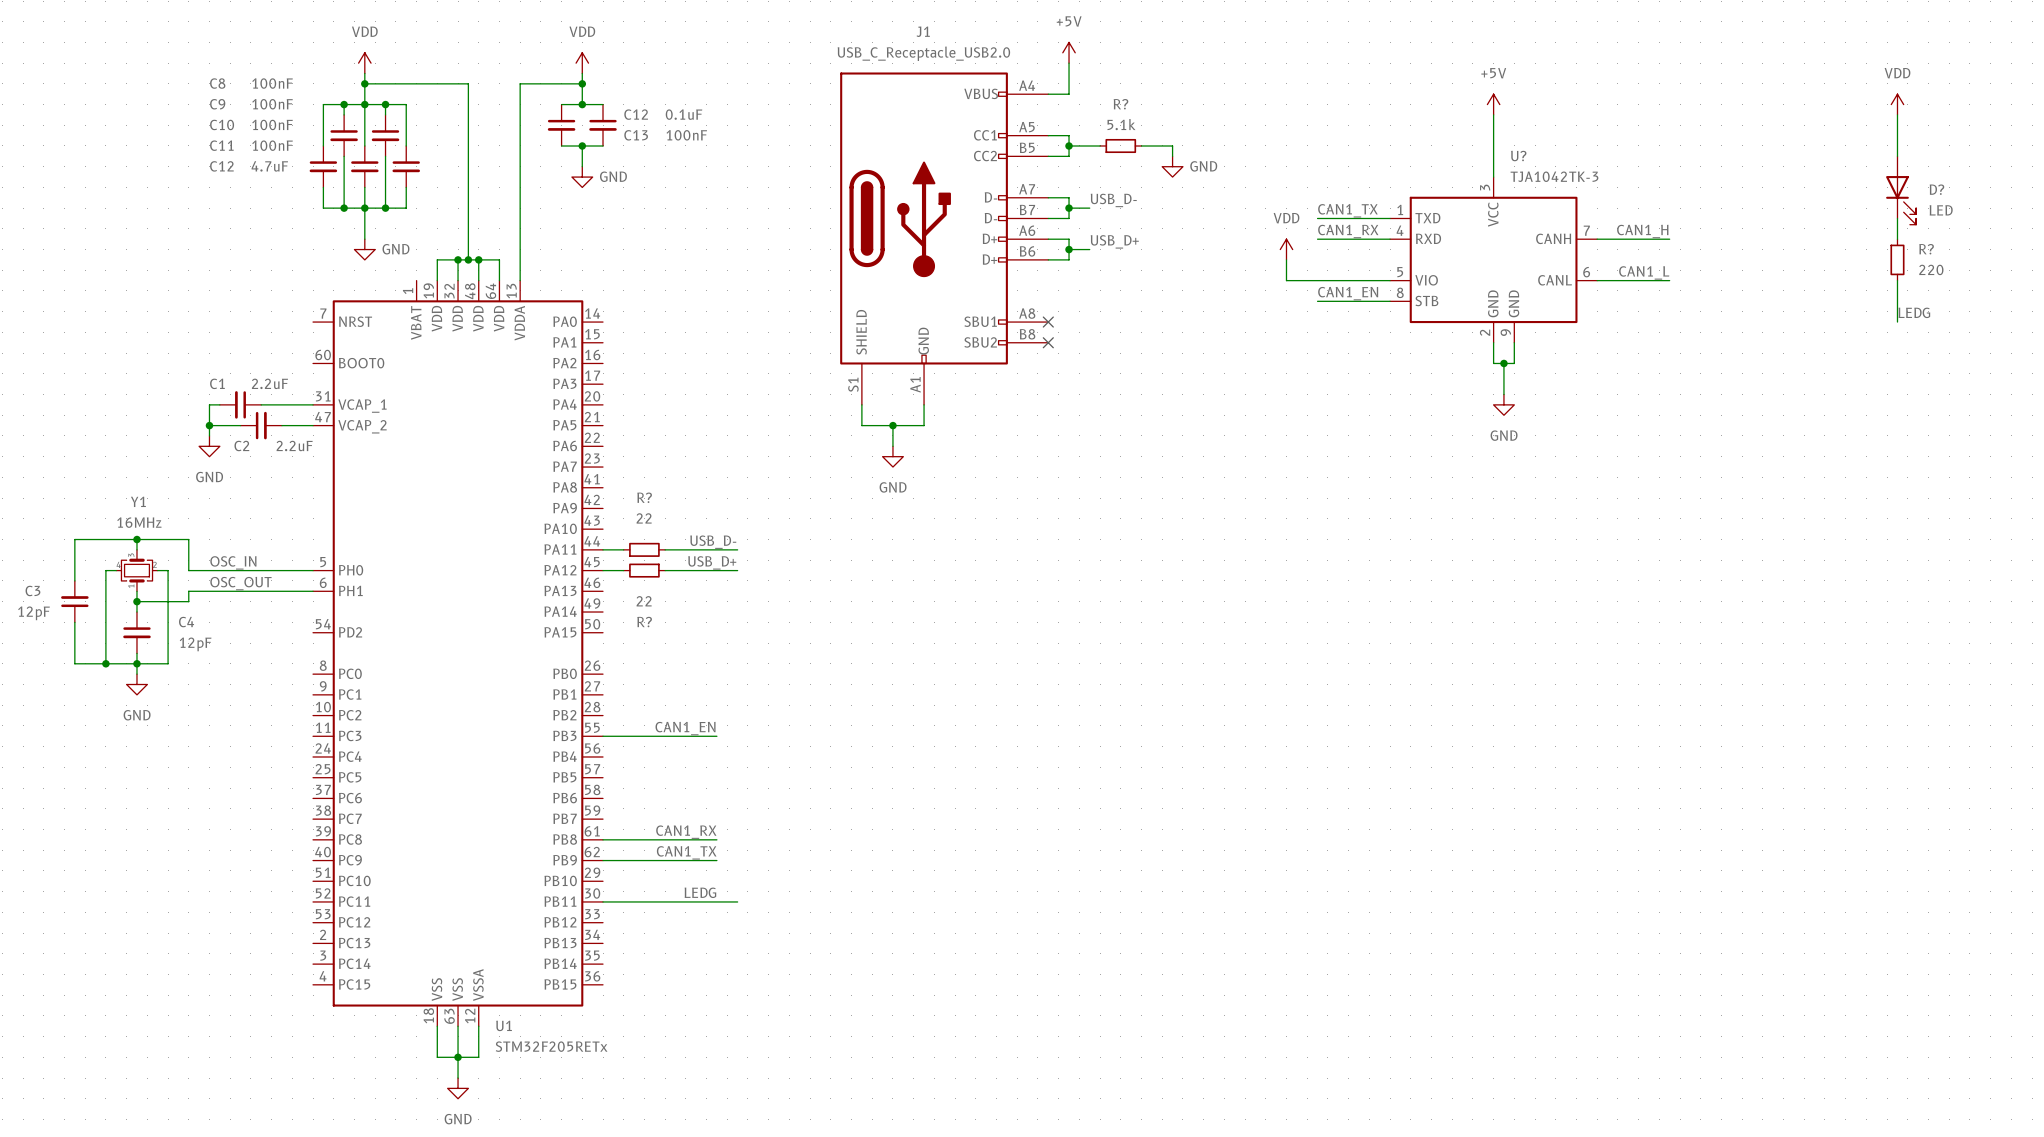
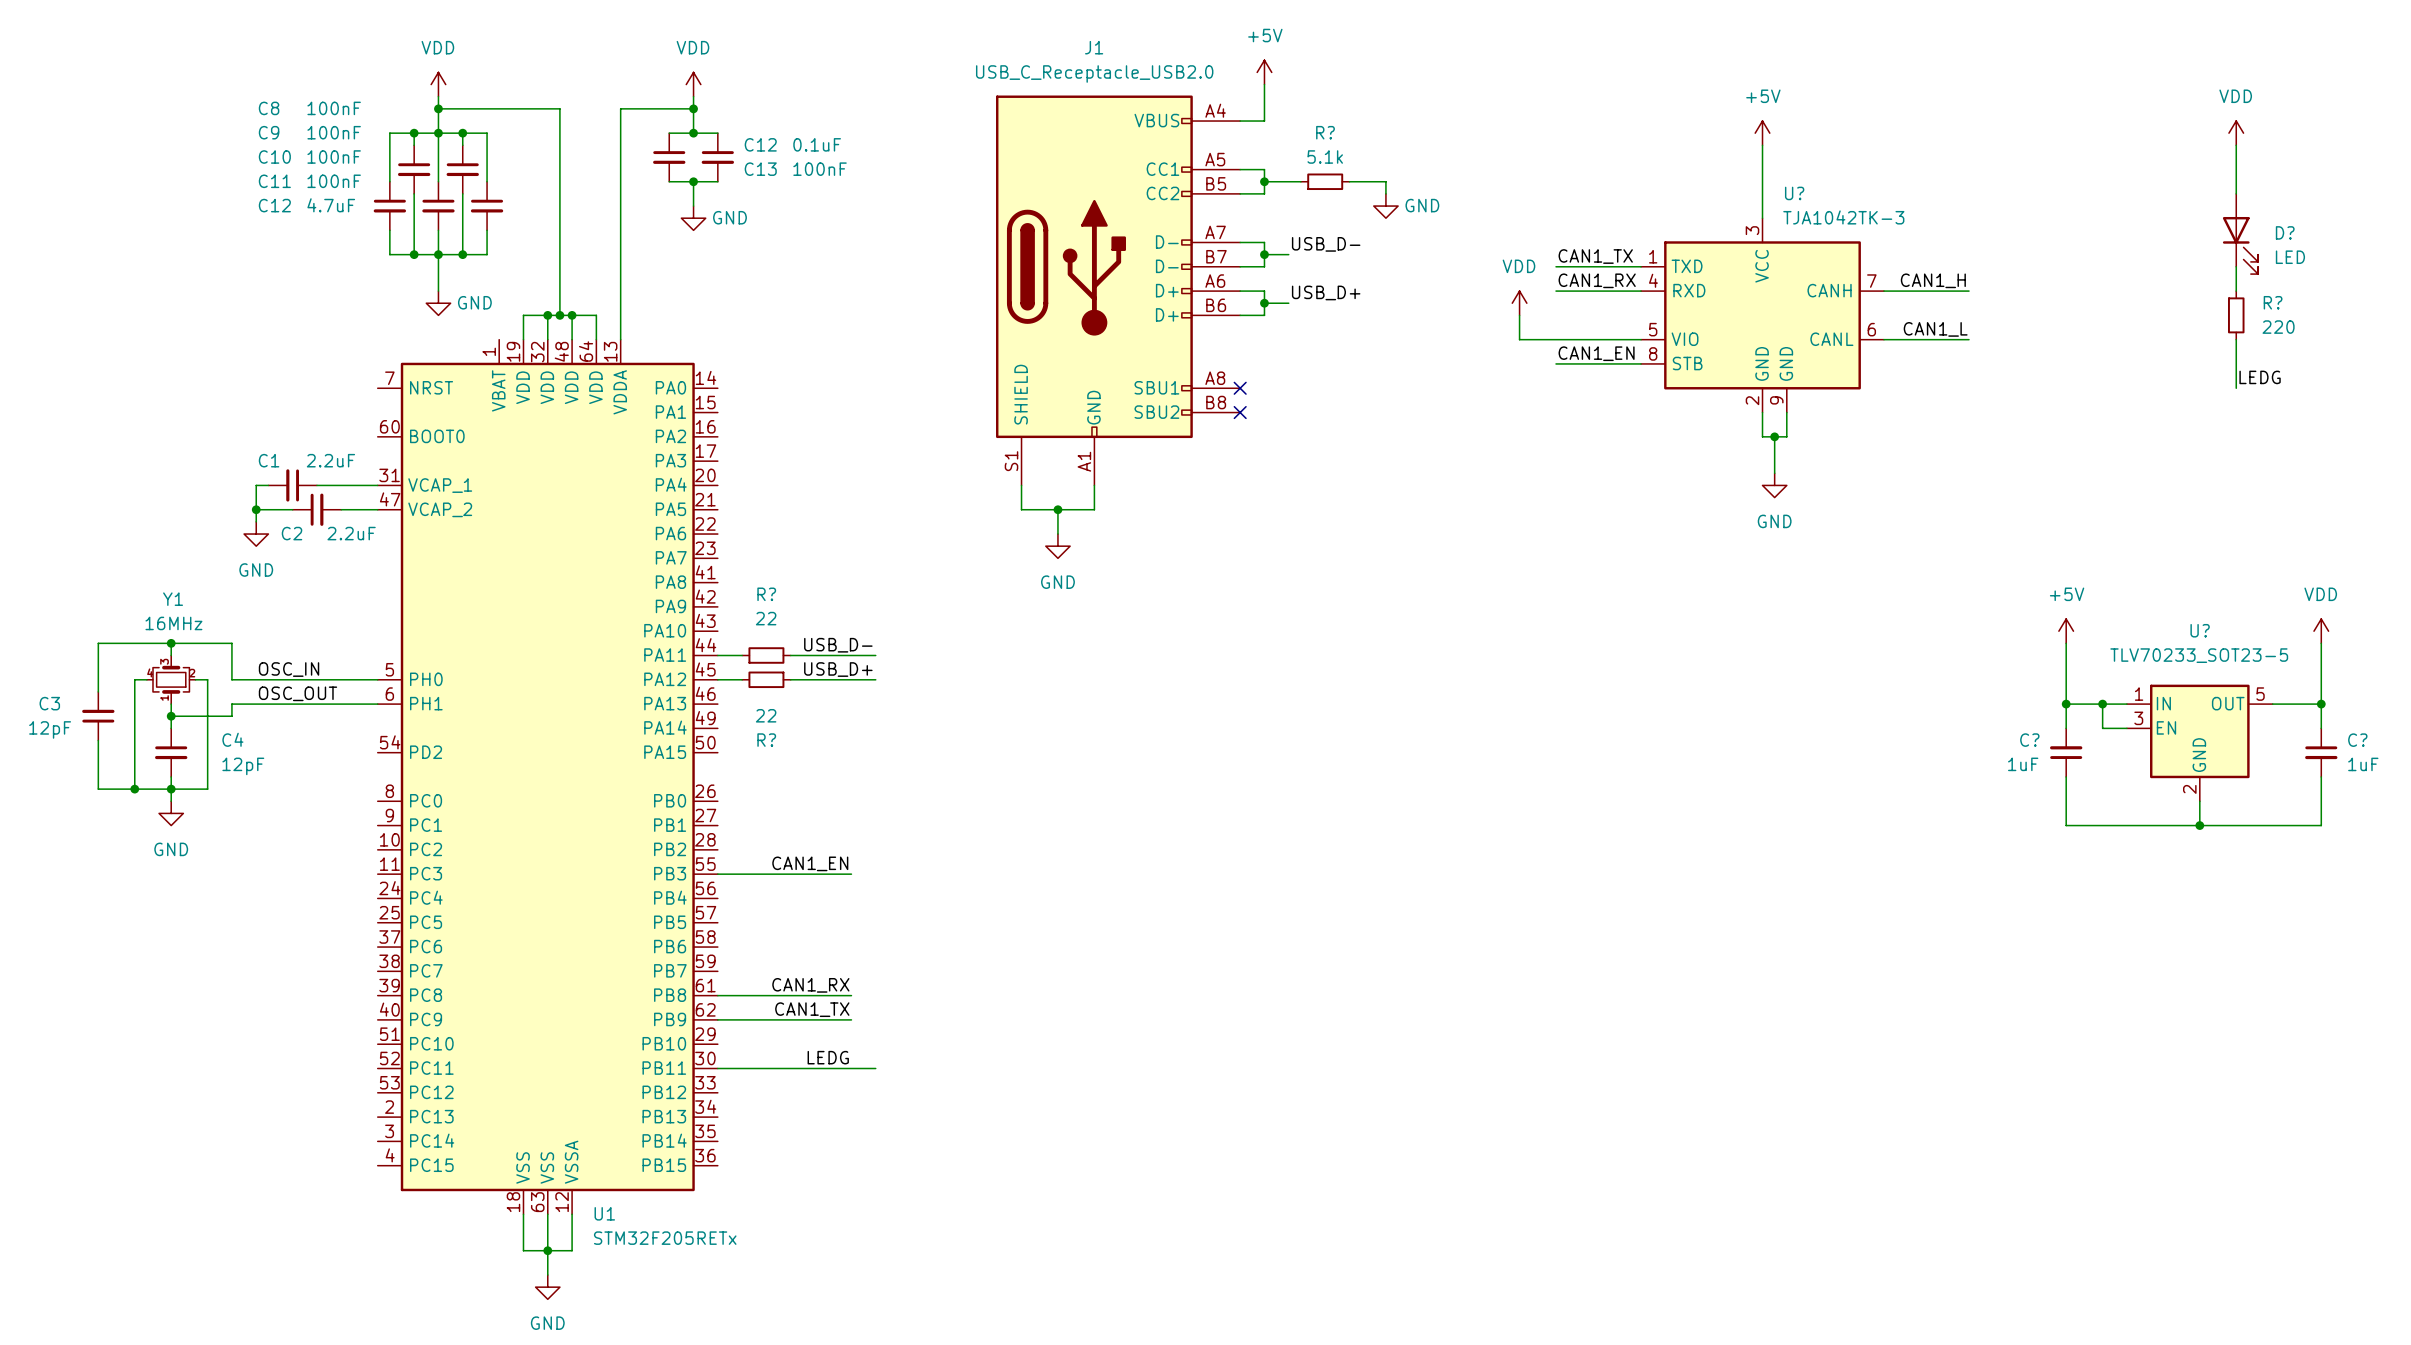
power symbol: none -> +5V (2066, 631)
power symbol: none -> VDD (2321, 631)
wire: none -> (2066, 643) (2066, 728)
wire: none -> (2321, 643) (2321, 728)
wire: none -> (2066, 704) (2126, 704)
junction: none -> (2066, 704)
wire: none -> (2102, 704) (2102, 728) (2126, 728)
junction: none -> (2102, 704)
wire: none -> (2272, 704) (2321, 704)
junction: none -> (2321, 704)
U?: none -> TLV70233_SOT23-5 (2199, 742)
C?: none -> 1uF (2066, 752)
C?: none -> 1uF (2321, 752)
wire: none -> (2066, 776) (2066, 825) (2321, 825) (2321, 776)
wire: none -> (2199, 801) (2199, 825)
junction: none -> (2199, 825)

